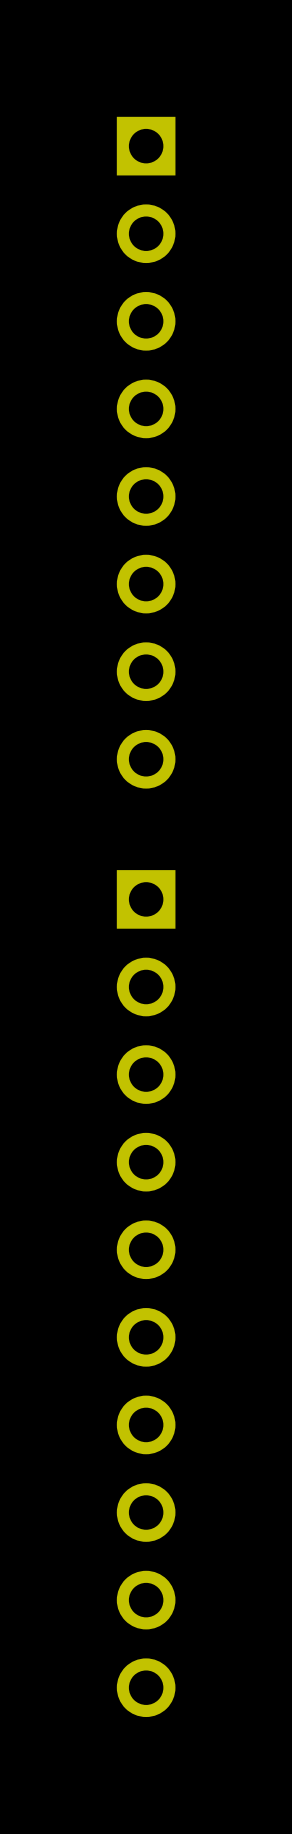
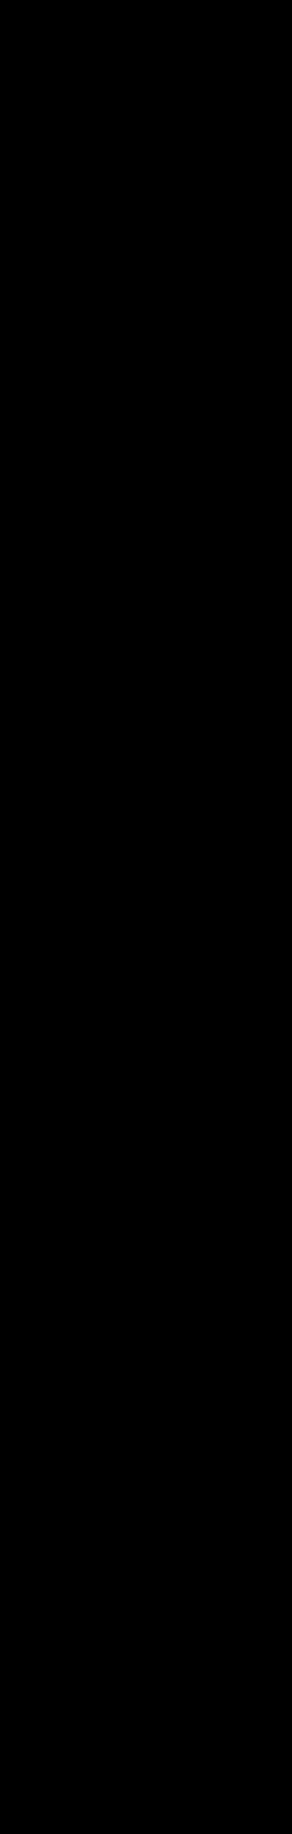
part: (146, 452) -> none
part: (146, 1293) -> none

